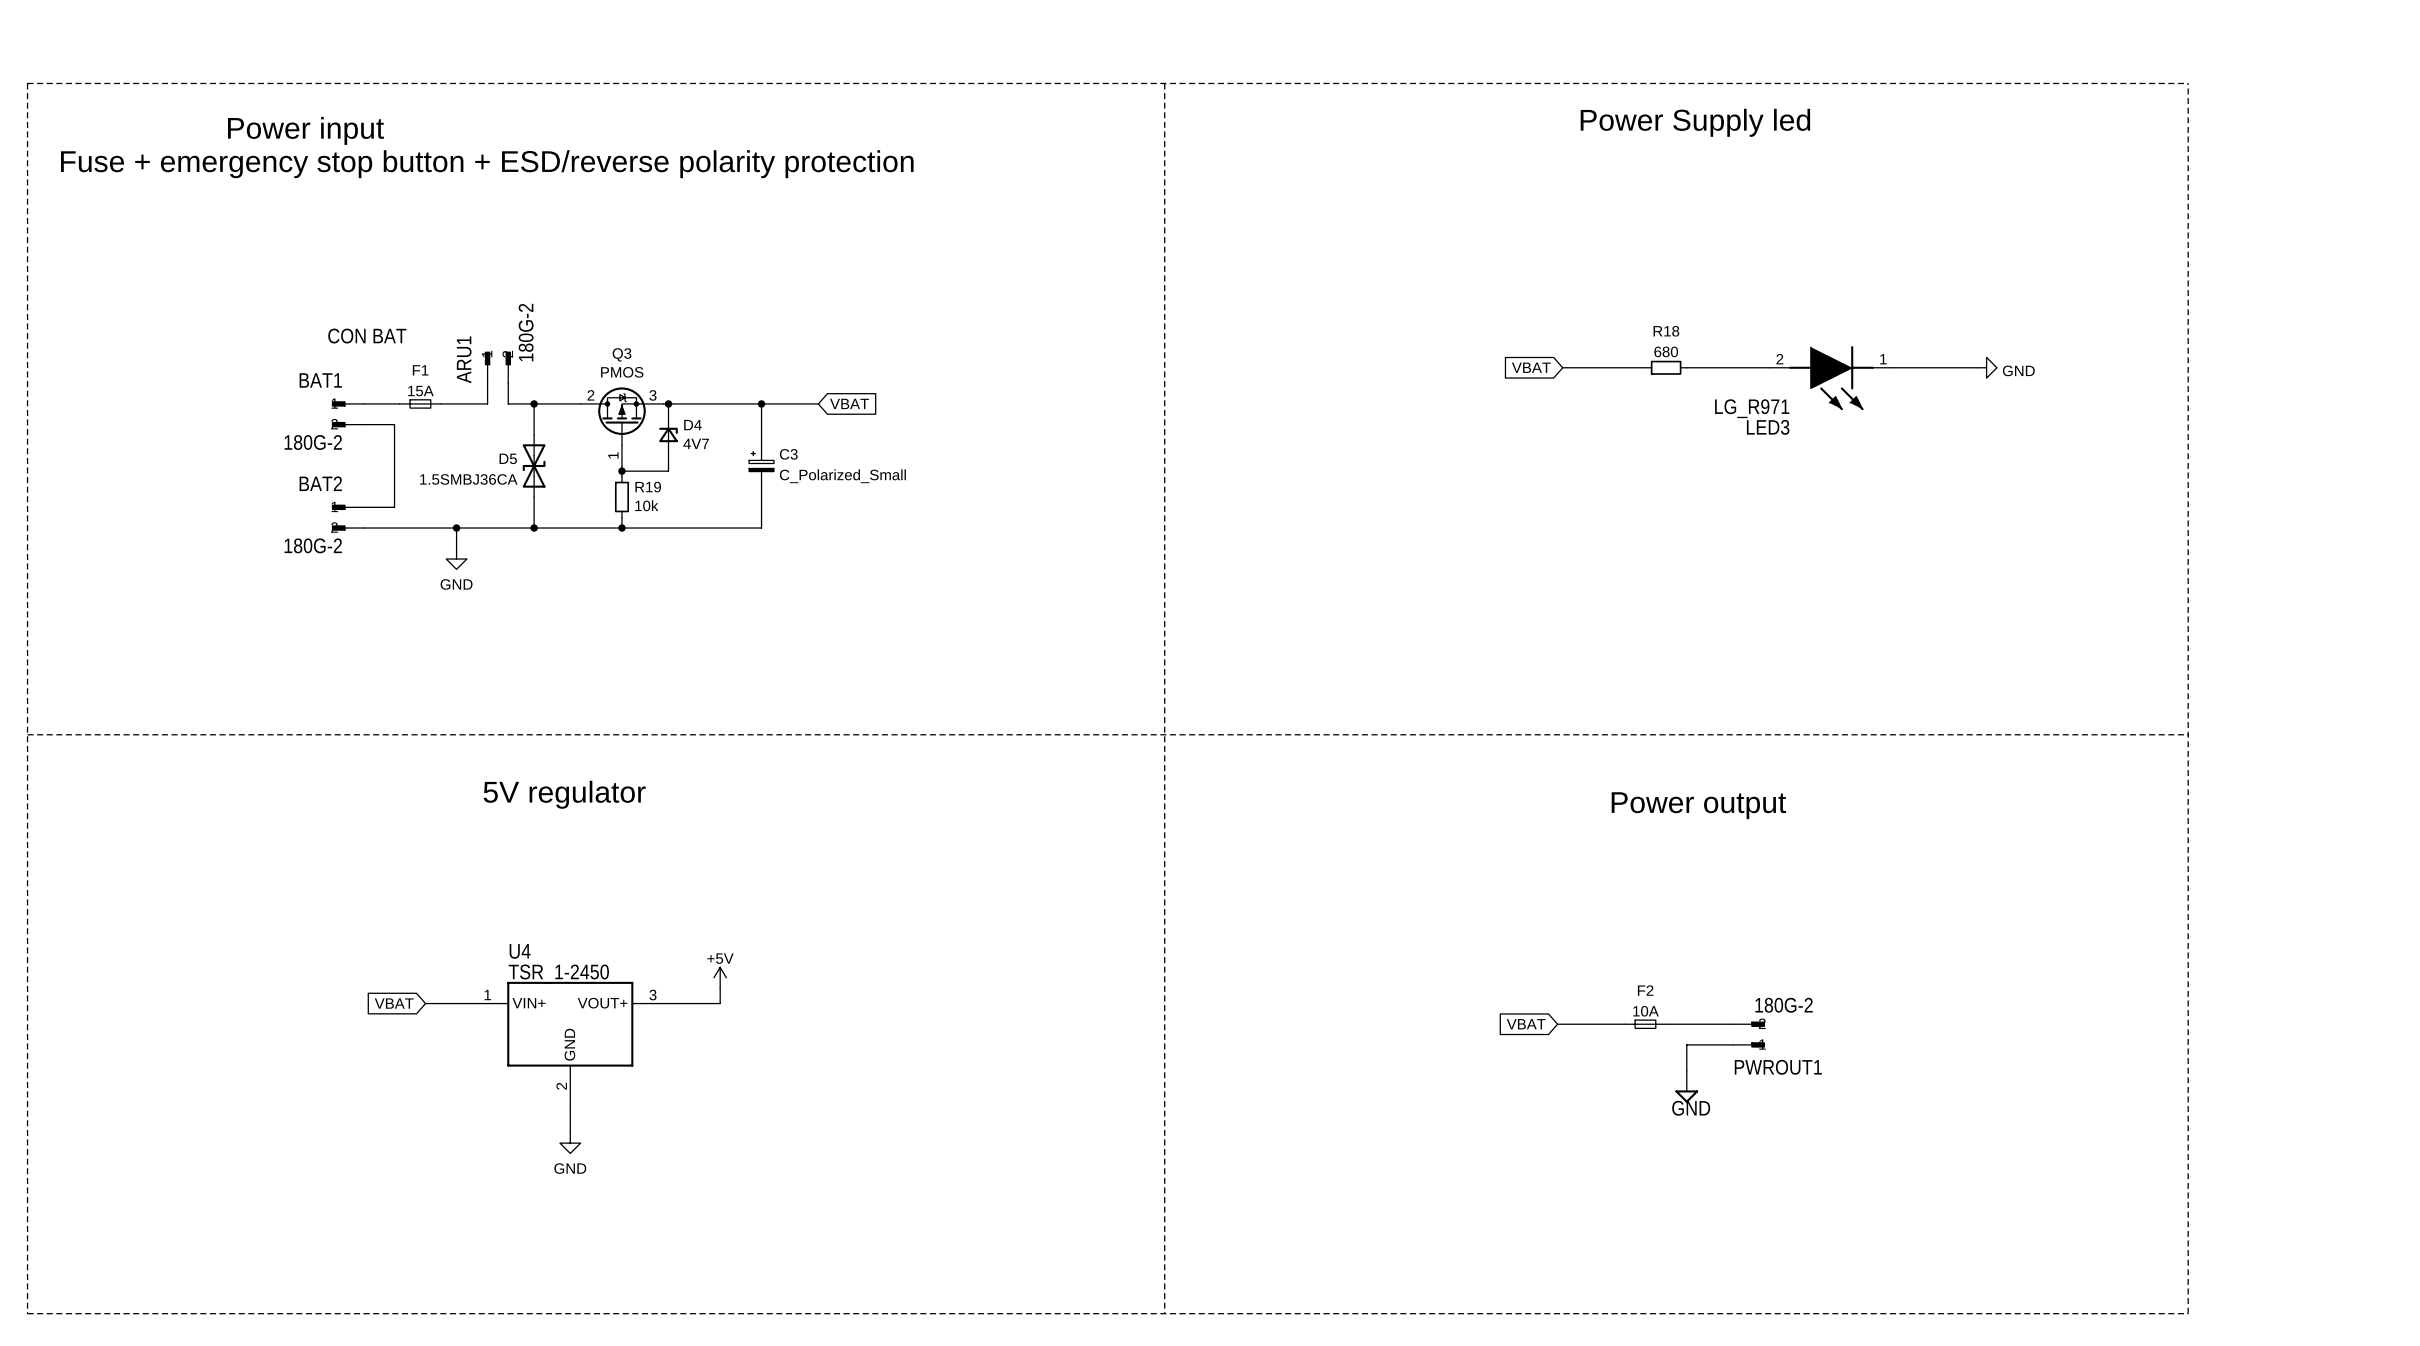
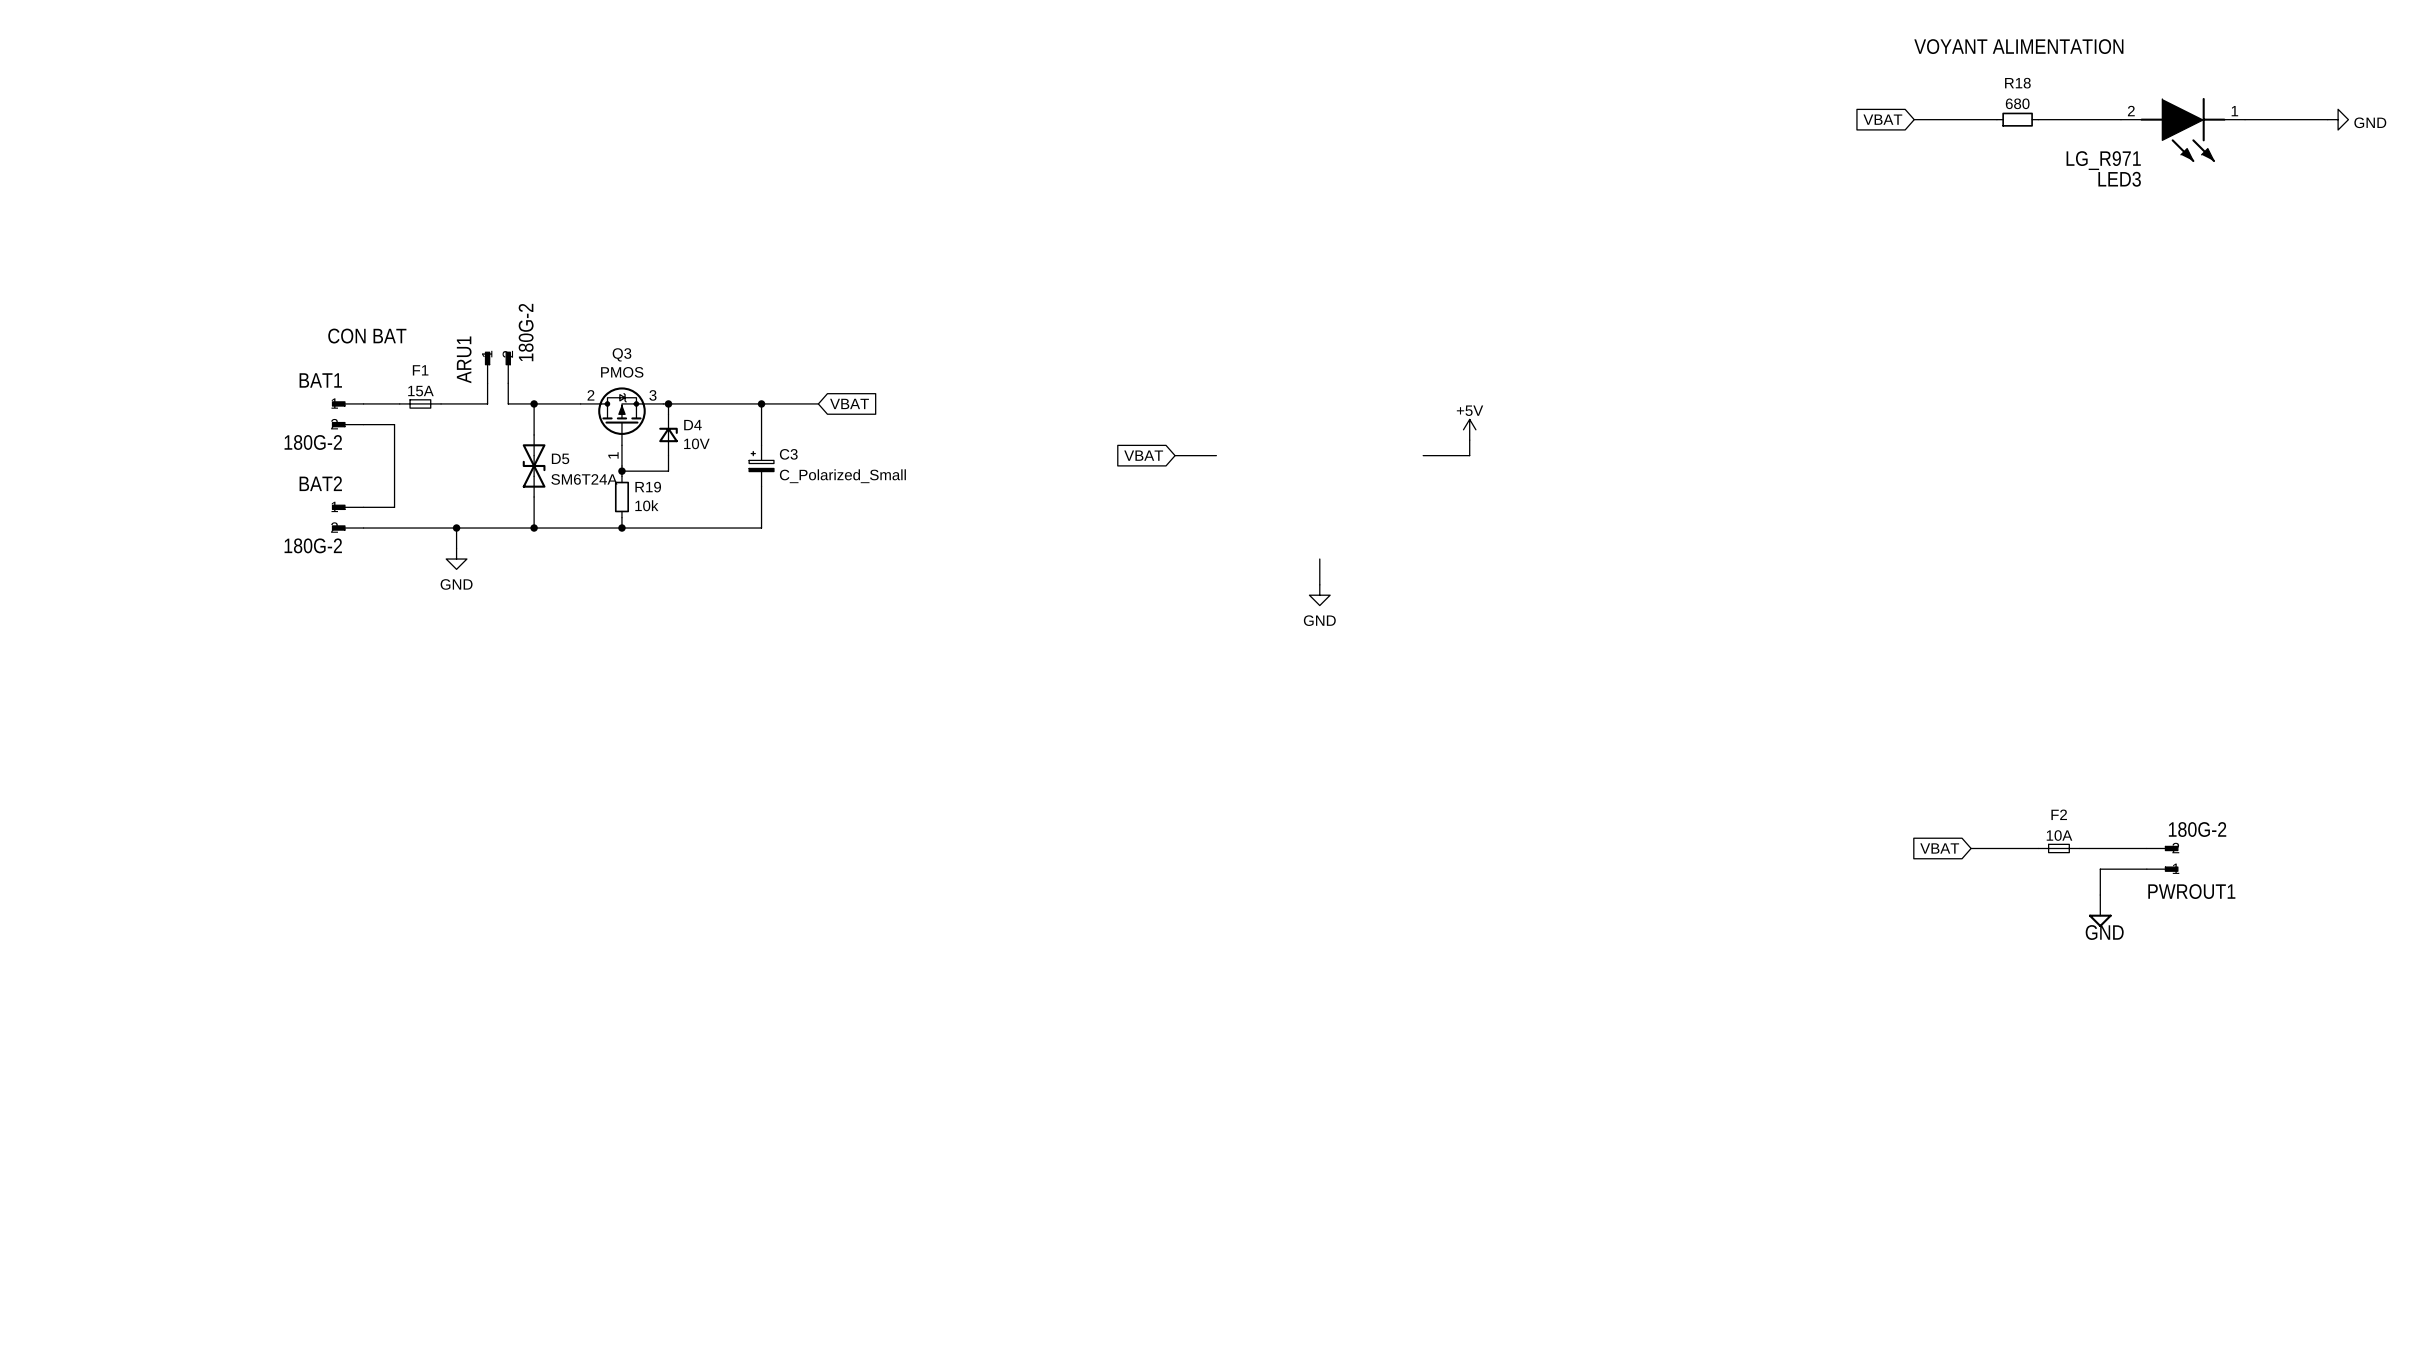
text: none -> VOYANT ALIMENTATION (2018, 46)
line: (27, 83) (27, 1313) (2188, 1313) (2188, 83) (27, 83) -> none
line: (1164, 83) (1164, 1313) -> none
global label: none -> VBAT (1882, 119)
wire: none -> (1914, 119) (1996, 119)
wire: none -> (2038, 119) (2120, 119)
wire: none -> (2245, 119) (2327, 119)
power symbol: none -> GND (2338, 119)
text: Power Supply led (1695, 122) -> none
text: Power input (306, 130) -> none
text: Fuse + emergency stop button + ESD/reverse polarity protection (487, 164) -> none
global label: VBAT (1531, 367) -> none
wire: (1562, 367) (1645, 367) -> none
R18 position: (1666, 367) -> (2017, 119)
wire: (1686, 367) (1769, 367) -> none
wire: (1893, 367) (1976, 367) -> none
power symbol: GND (1986, 367) -> none
LED3 position: (1831, 378) -> (2183, 129)
power symbol: none -> +5V (1469, 429)
wire: none -> (1469, 440) (1469, 455) (1423, 455)
D4 value: 4V7 (696, 443) -> 10V (696, 443)
global label: none -> VBAT (1143, 455)
wire: none -> (1175, 455) (1216, 455)
D5 flip: as is (534, 465) -> left-right (534, 465)
D5 value: 1.5SMBJ36CA (468, 479) -> SM6T24A (584, 479)
wire: none -> (1319, 559) (1319, 584)
power symbol: none -> GND (1319, 595)
line: (27, 734) (2188, 734) -> none
text: 5V regulator (564, 794) -> none
text: Power output (1698, 805) -> none
global label: none -> VBAT (1939, 848)
wire: none -> (1971, 848) (2038, 848)
wire: none -> (2079, 848) (2146, 848)
wire: none -> (2146, 869) (2100, 869) (2100, 895)
power symbol: none -> GND (2100, 911)
power symbol: +5V (720, 977) -> none
wire: (720, 988) (720, 1003) (673, 1003) -> none
global label: VBAT (394, 1003) -> none
wire: (425, 1003) (466, 1003) -> none
global label: VBAT (1526, 1024) -> none
wire: (1557, 1024) (1624, 1024) -> none
F2 position: (1645, 1024) -> (2058, 848)
wire: (1666, 1024) (1733, 1024) -> none
PWROUT1 position: (1748, 1034) -> (2162, 858)
U4: TSR_1-2450 (570, 1044) -> none
wire: (1733, 1044) (1686, 1044) (1686, 1070) -> none
power symbol: GND (1686, 1086) -> none
wire: (570, 1106) (570, 1132) -> none
power symbol: GND (570, 1143) -> none

